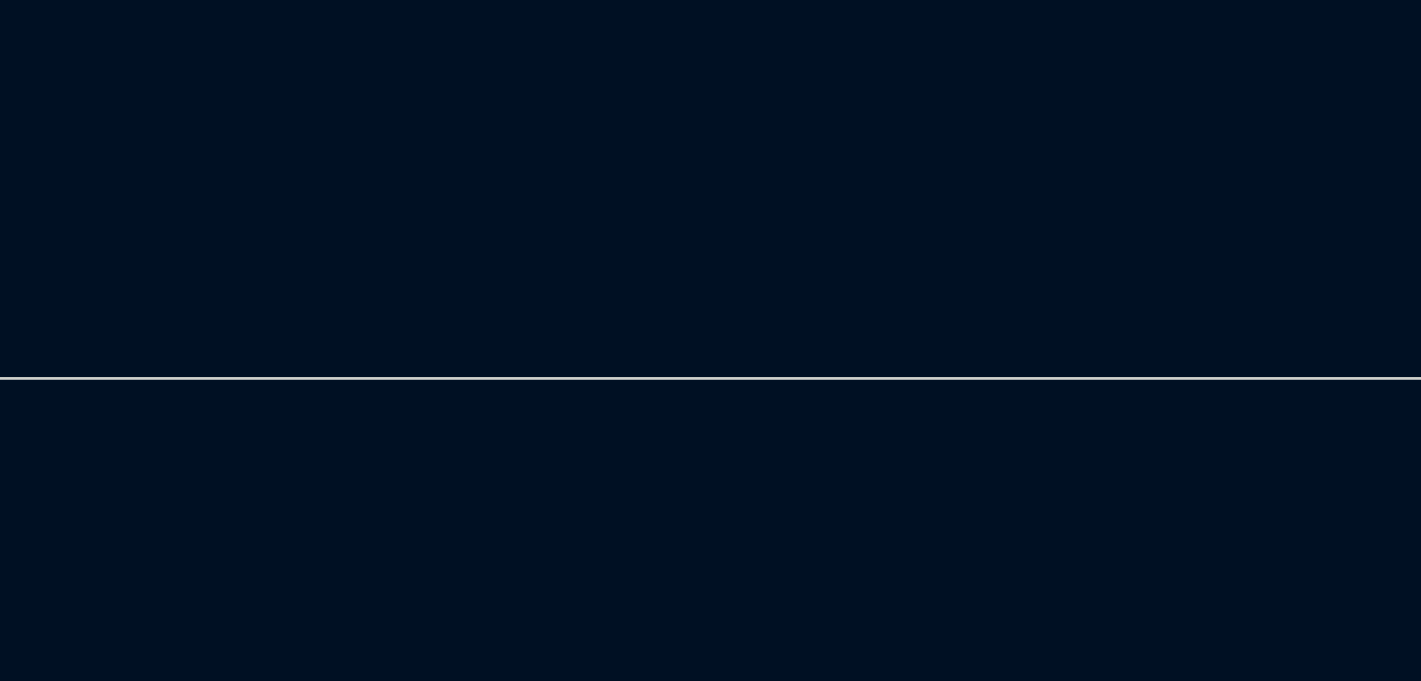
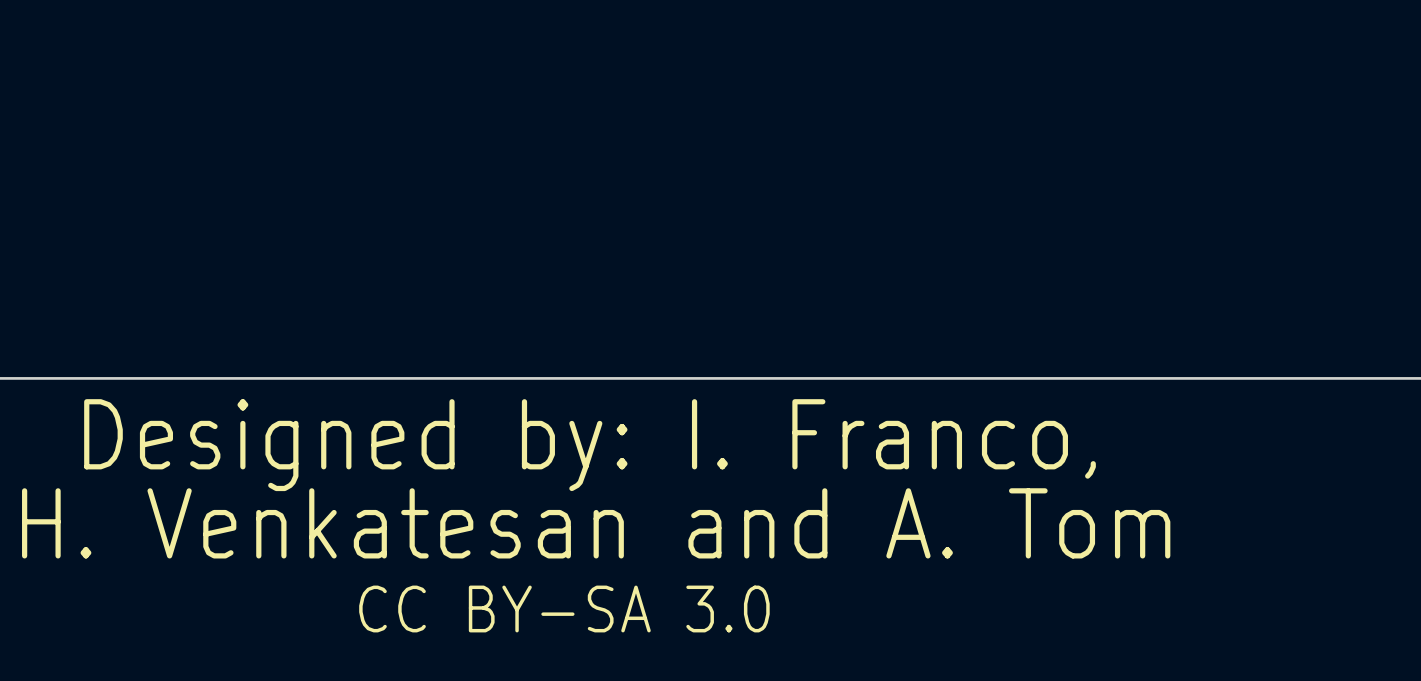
text: none -> Designed by: I. Franco, (590, 445)
text: none -> H. Venkatesan and A. Tom (596, 523)
text: none -> CC BY-SA 3.0 (564, 608)

